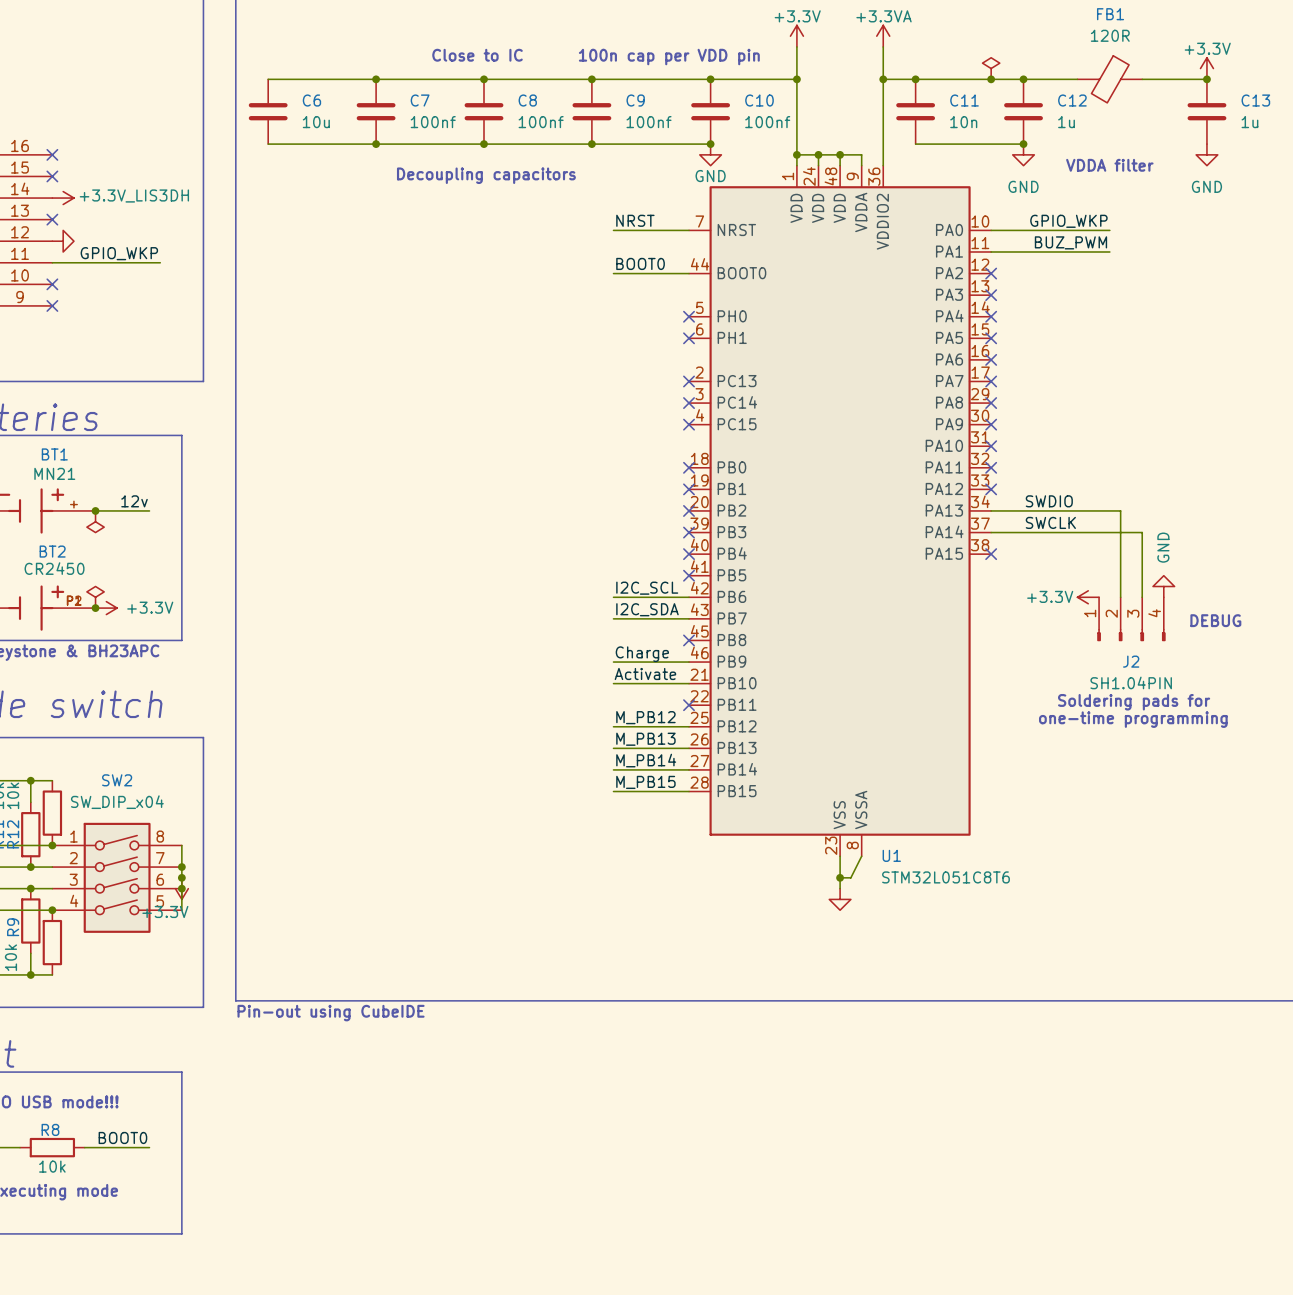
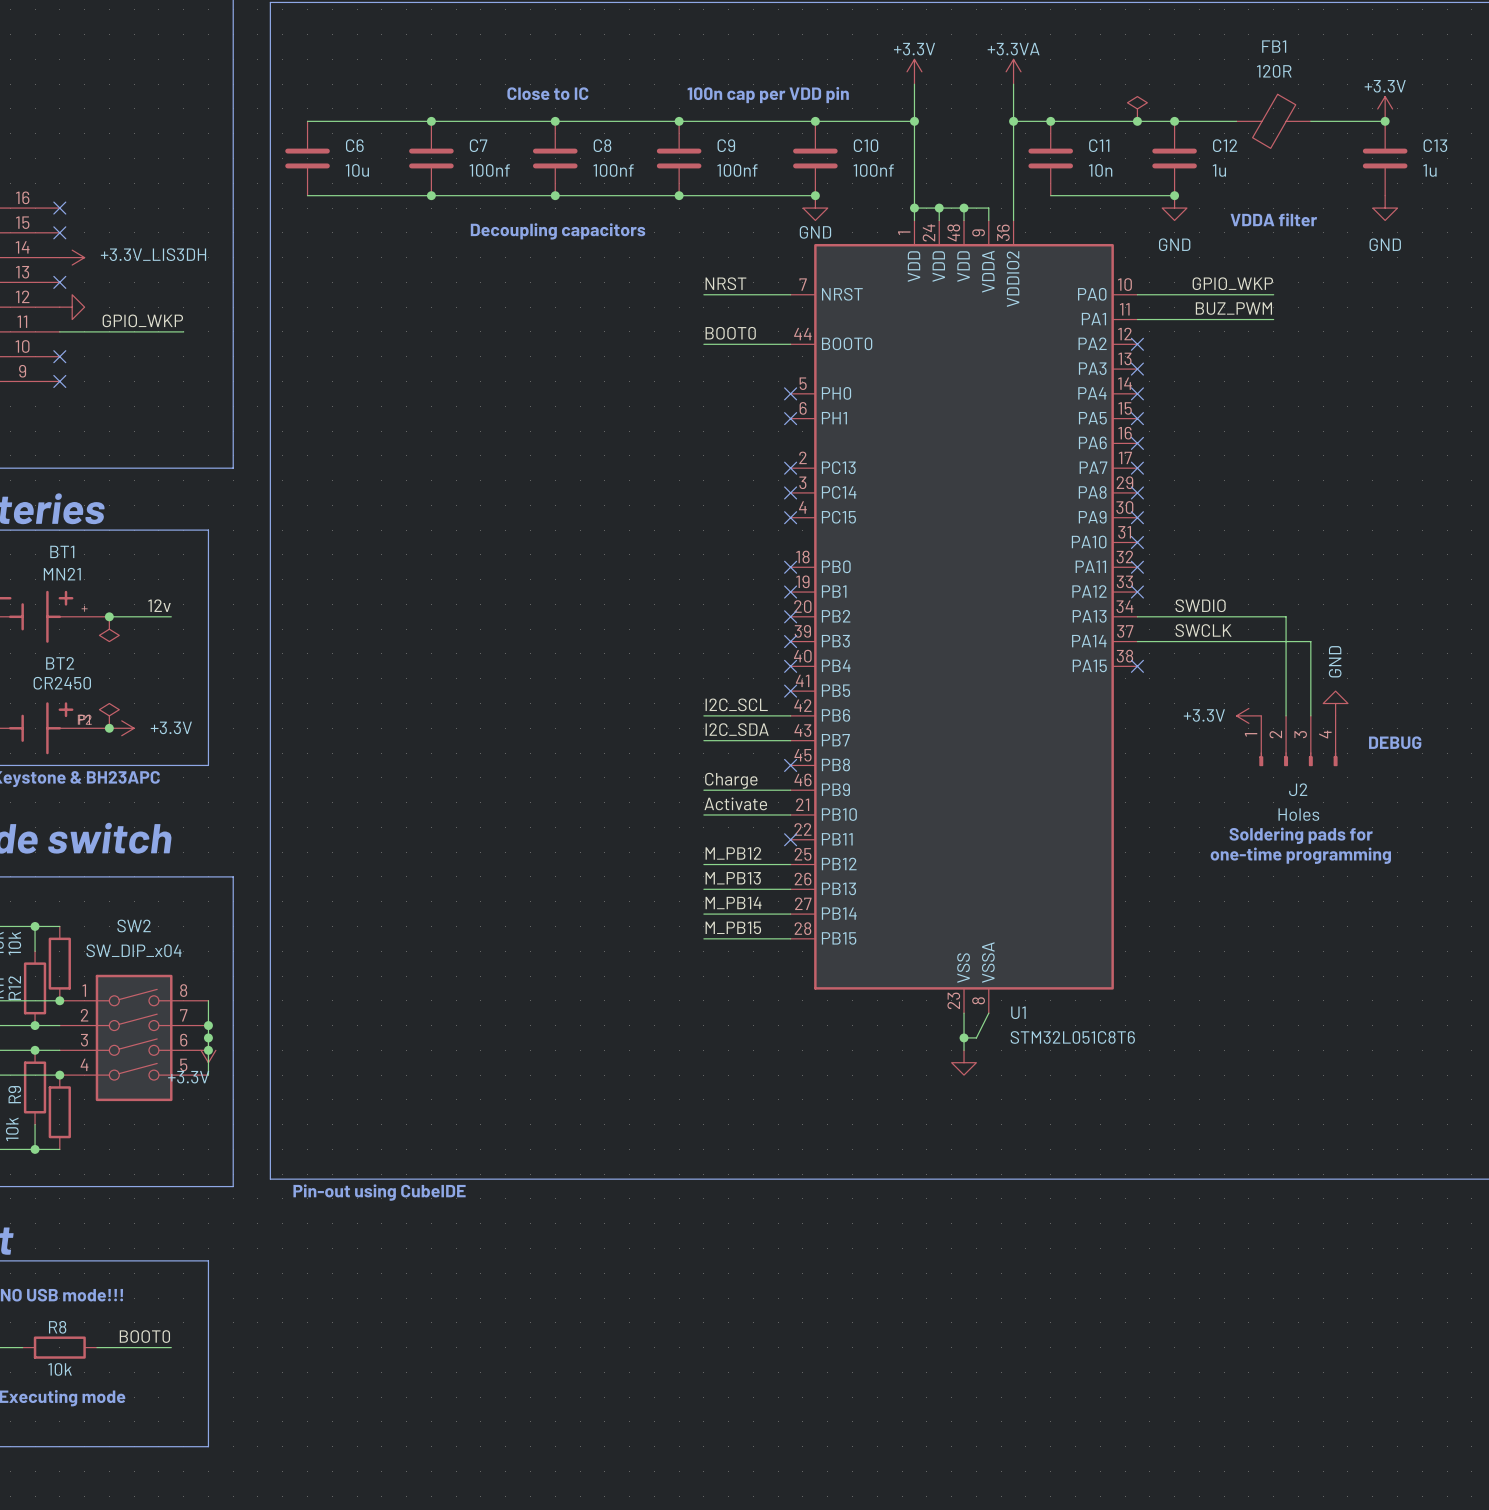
J2 value: SH1.04PIN (1131, 682) -> Holes (1298, 814)

